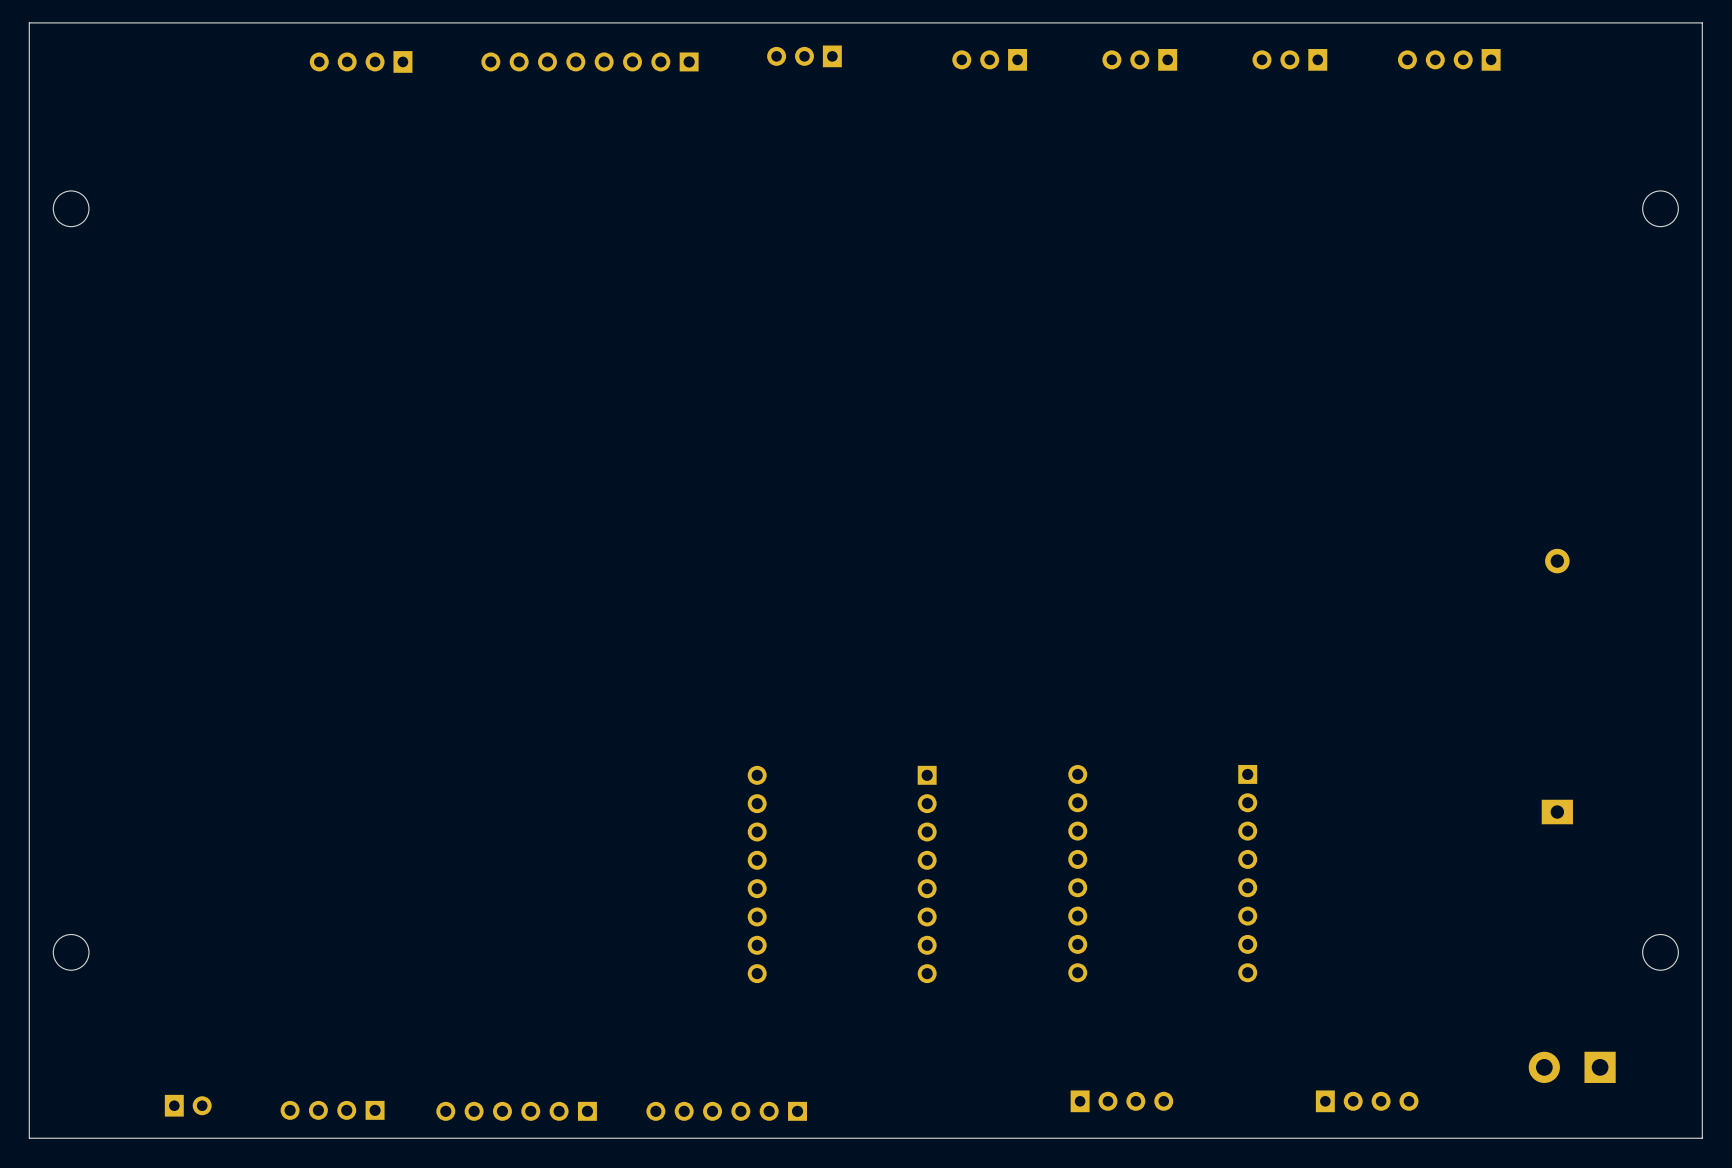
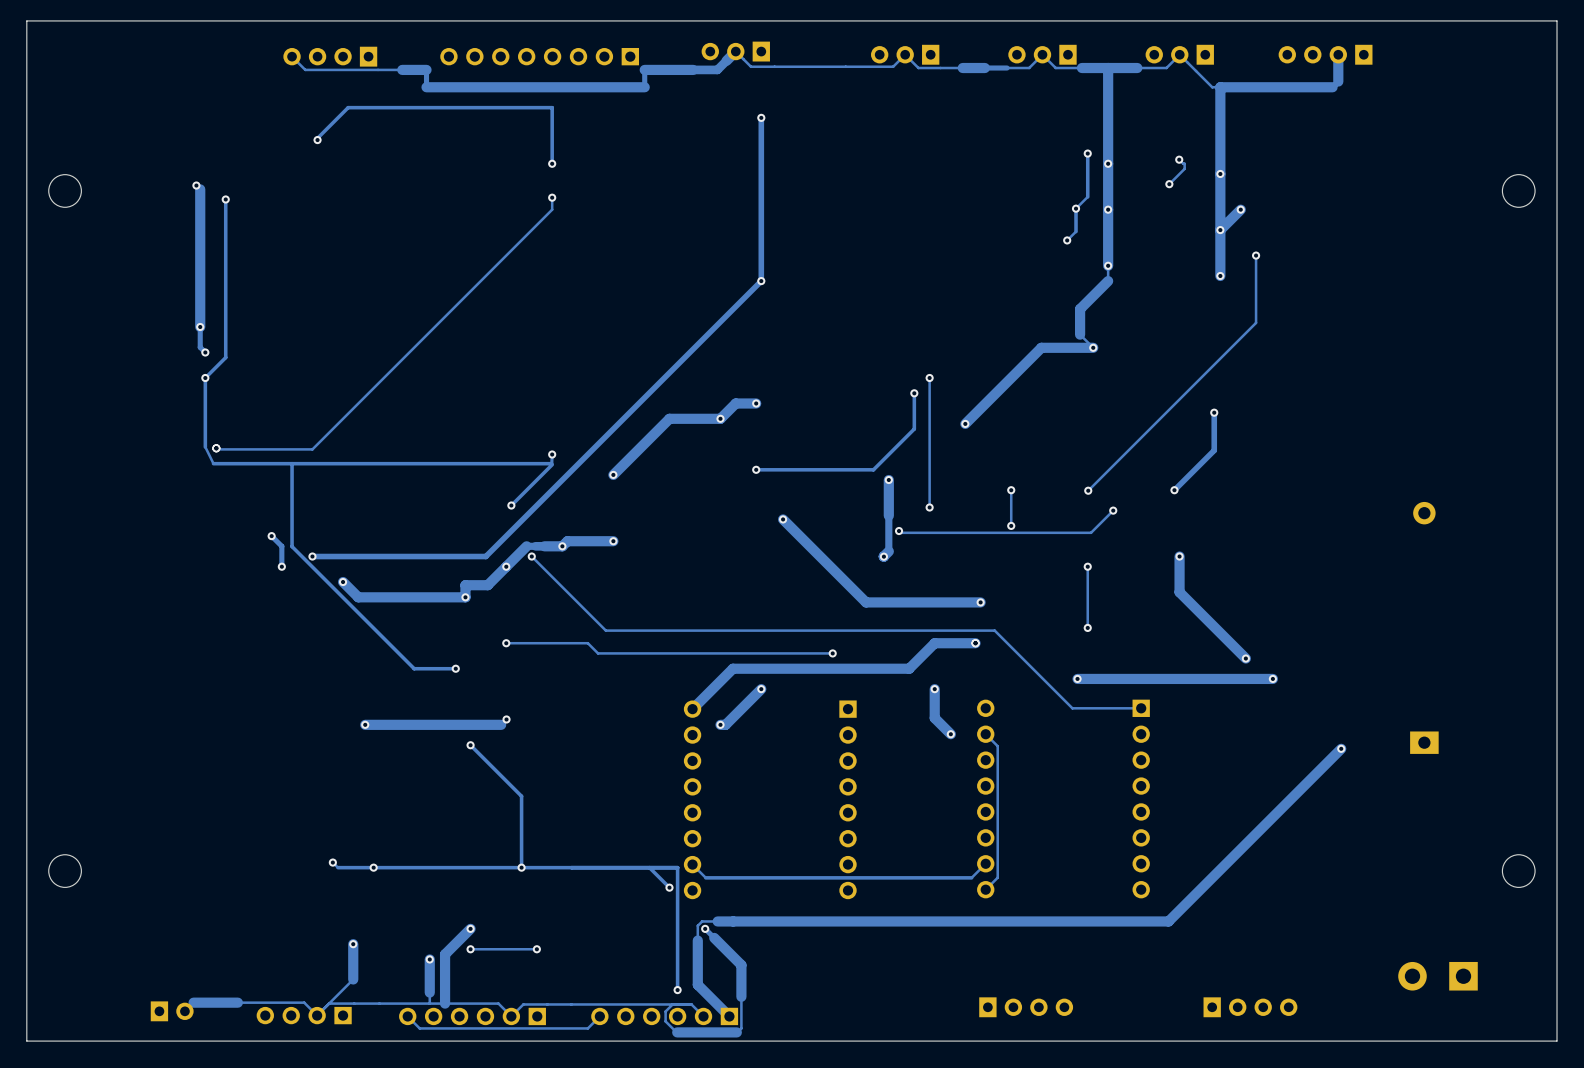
track: none -> (1338, 54) (1338, 81) (1332, 87) (1220, 87)
track: none -> (292, 56) (305, 69) (426, 69) (426, 87) (644, 87) (644, 69) (717, 69) (735, 51) (750, 66) (893, 66) (905, 54) (918, 68) (1029, 68) (1042, 54) (1055, 68) (1166, 68) (1179, 54) (1212, 87) (1220, 87)
track: none -> (1108, 68) (1108, 281) (1080, 309) (1080, 334) (1093, 347) (1041, 347) (965, 423)
track: none -> (1220, 87) (1220, 275)
track: none -> (761, 117) (761, 281) (485, 556) (312, 556)
via: none -> (761, 117)
track: none -> (317, 140) (348, 107) (552, 107) (552, 163)
via: none -> (317, 140)
track: none -> (1087, 153) (1087, 196) (1076, 208) (1076, 231) (1067, 240)
via: none -> (1087, 153)
track: none -> (1179, 159) (1184, 163) (1184, 168) (1169, 184)
via: none -> (1179, 159)
via: none -> (552, 163)
via: none -> (1108, 163)
via: none -> (1220, 173)
via: none -> (1169, 184)
track: none -> (196, 185) (200, 189) (200, 347) (205, 352)
via: none -> (196, 185)
track: none -> (552, 197) (552, 209) (312, 449) (216, 448)
via: none -> (552, 197)
track: none -> (225, 199) (225, 357) (205, 378) (205, 447) (213, 463) (551, 463) (552, 454) (552, 464) (511, 505)
via: none -> (225, 199)
via: none -> (1076, 208)
via: none -> (1108, 209)
track: none -> (1240, 209) (1220, 230)
via: none -> (1240, 209)
via: none -> (1220, 230)
via: none -> (1067, 240)
track: none -> (1256, 255) (1256, 322) (1088, 490)
via: none -> (1256, 255)
via: none -> (1108, 265)
via: none -> (1220, 275)
via: none -> (761, 281)
via: none -> (200, 326)
via: none -> (1093, 347)
via: none -> (205, 352)
via: none -> (205, 378)
track: none -> (929, 378) (929, 507)
via: none -> (929, 378)
track: none -> (914, 393) (914, 429) (873, 469) (756, 469)
via: none -> (914, 393)
track: none -> (756, 403) (735, 403) (720, 418) (669, 418) (613, 474)
via: none -> (756, 403)
track: none -> (1214, 412) (1214, 450) (1174, 490)
via: none -> (1214, 412)
via: none -> (720, 418)
via: none -> (965, 423)
via: none -> (216, 448)
via: none -> (552, 454)
track: none -> (292, 463) (292, 546) (414, 668) (455, 668)
via: none -> (756, 469)
via: none -> (613, 474)
track: none -> (888, 480) (888, 551) (883, 556)
via: none -> (888, 480)
track: none -> (1011, 490) (1011, 525)
via: none -> (1011, 490)
via: none -> (1174, 490)
via: none -> (1088, 490)
via: none -> (511, 505)
via: none -> (929, 507)
track: none -> (1113, 510) (1091, 532) (900, 532) (899, 531)
via: none -> (1113, 510)
track: none -> (783, 519) (866, 602) (980, 602)
via: none -> (783, 519)
via: none -> (1011, 525)
via: none -> (899, 531)
track: none -> (271, 536) (281, 546) (281, 566)
via: none -> (271, 536)
track: none -> (613, 541) (567, 541) (562, 546) (526, 546) (487, 585) (465, 585) (465, 597) (358, 597) (343, 582)
via: none -> (613, 541)
via: none -> (562, 546)
via: none -> (312, 556)
track: none -> (531, 556) (605, 630) (994, 630) (1072, 708) (1141, 708)
via: none -> (531, 556)
via: none -> (883, 556)
track: none -> (1179, 556) (1179, 592) (1245, 658)
via: none -> (1179, 556)
via: none -> (281, 566)
via: none -> (506, 566)
track: none -> (1087, 566) (1087, 627)
via: none -> (1087, 566)
via: none -> (343, 582)
via: none -> (465, 597)
via: none -> (980, 602)
via: none -> (1087, 627)
track: none -> (506, 643) (587, 643) (598, 653) (832, 653)
via: none -> (506, 643)
track: none -> (975, 643) (934, 643) (909, 668) (732, 668) (692, 709)
via: none -> (975, 643)
via: none -> (832, 653)
via: none -> (1245, 658)
via: none -> (455, 668)
via: none -> (1077, 678)
track: none -> (1272, 678) (1077, 678)
via: none -> (1272, 678)
track: none -> (761, 689) (725, 724) (720, 724)
via: none -> (761, 689)
track: none -> (934, 689) (934, 718) (950, 734)
via: none -> (934, 689)
track: none -> (506, 719) (501, 724) (365, 724)
via: none -> (506, 719)
via: none -> (365, 724)
via: none -> (720, 724)
via: none -> (950, 734)
track: none -> (985, 734) (997, 746) (997, 877) (985, 889)
track: none -> (470, 745) (521, 796) (521, 867)
via: none -> (470, 745)
track: none -> (1341, 748) (1168, 921) (702, 921) (697, 925) (697, 984) (729, 1016)
via: none -> (1341, 748)
track: none -> (332, 862) (337, 867) (677, 867) (677, 990)
via: none -> (332, 862)
track: none -> (985, 863) (971, 877) (705, 877) (692, 864)
via: none -> (373, 867)
via: none -> (521, 867)
track: none -> (649, 867) (669, 887)
via: none -> (669, 887)
track: none -> (470, 928) (445, 954) (445, 1003)
via: none -> (470, 928)
track: none -> (705, 928) (741, 965) (741, 1028) (736, 1033)
via: none -> (705, 928)
track: none -> (353, 944) (353, 979) (317, 1015) (304, 1002) (193, 1002) (184, 1011)
via: none -> (353, 944)
via: none -> (470, 949)
track: none -> (536, 949) (470, 949)
via: none -> (536, 949)
track: none -> (429, 959) (429, 1003)
via: none -> (429, 959)
via: none -> (677, 990)
track: none -> (329, 1003) (498, 1003) (511, 1016) (523, 1004) (691, 1004) (703, 1016)
track: none -> (672, 1004) (665, 1011) (665, 1021) (677, 1033)
track: none -> (599, 1016) (587, 1028) (419, 1028) (407, 1016)
track: none -> (736, 1032) (677, 1032)

